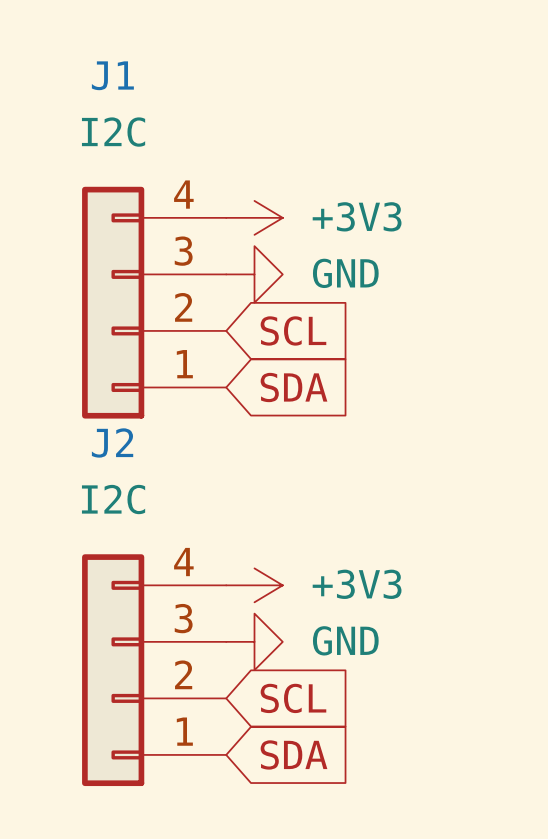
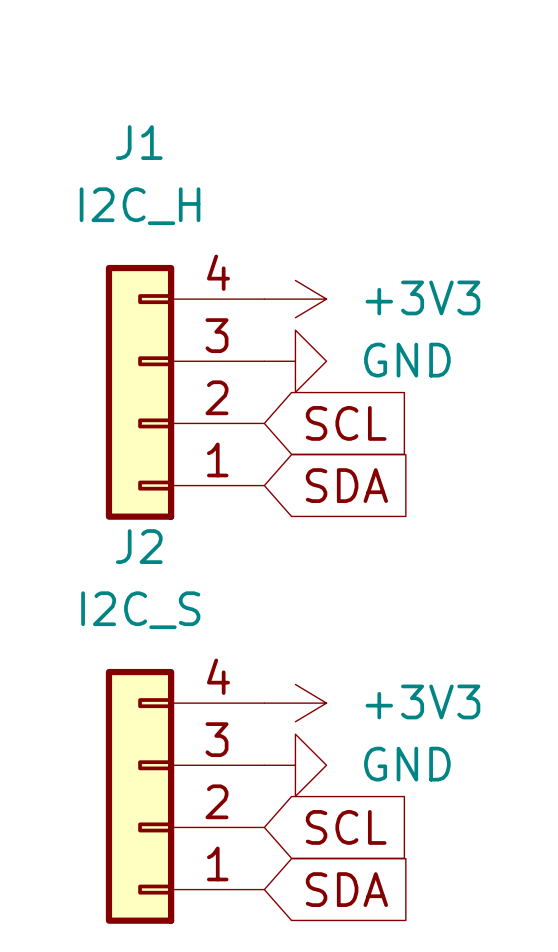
J1 value: I2C (113, 132) -> I2C_H (140, 206)
J2 value: I2C (113, 499) -> I2C_S (140, 610)

